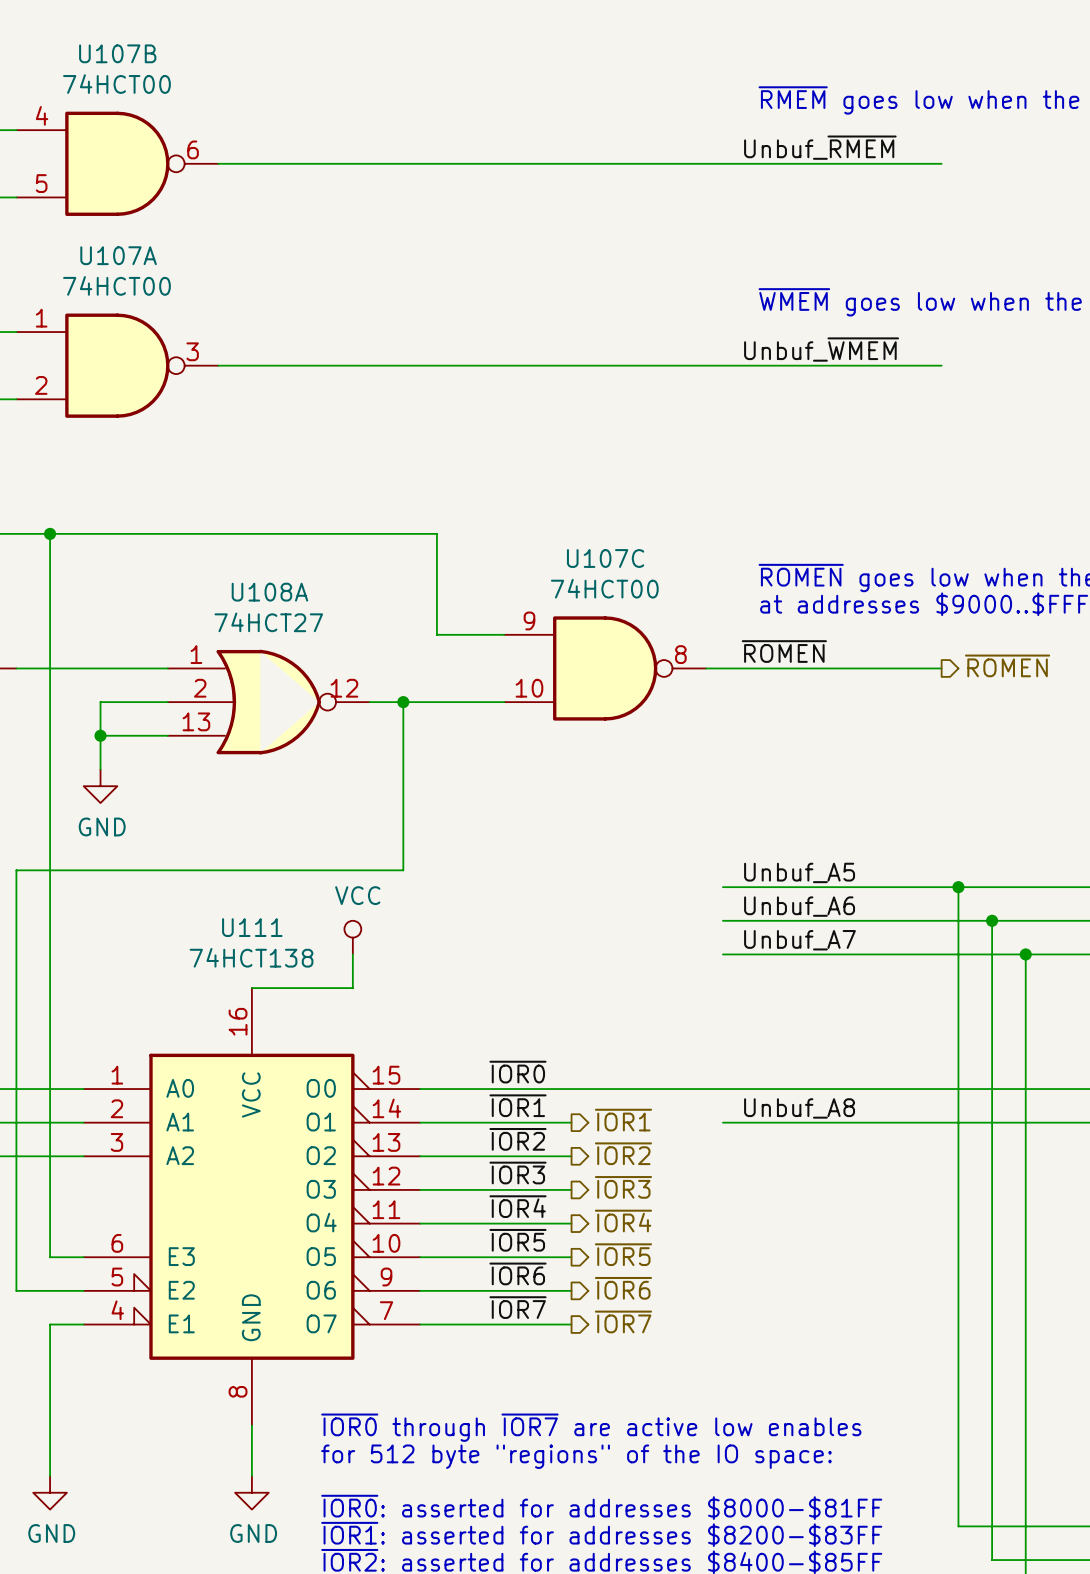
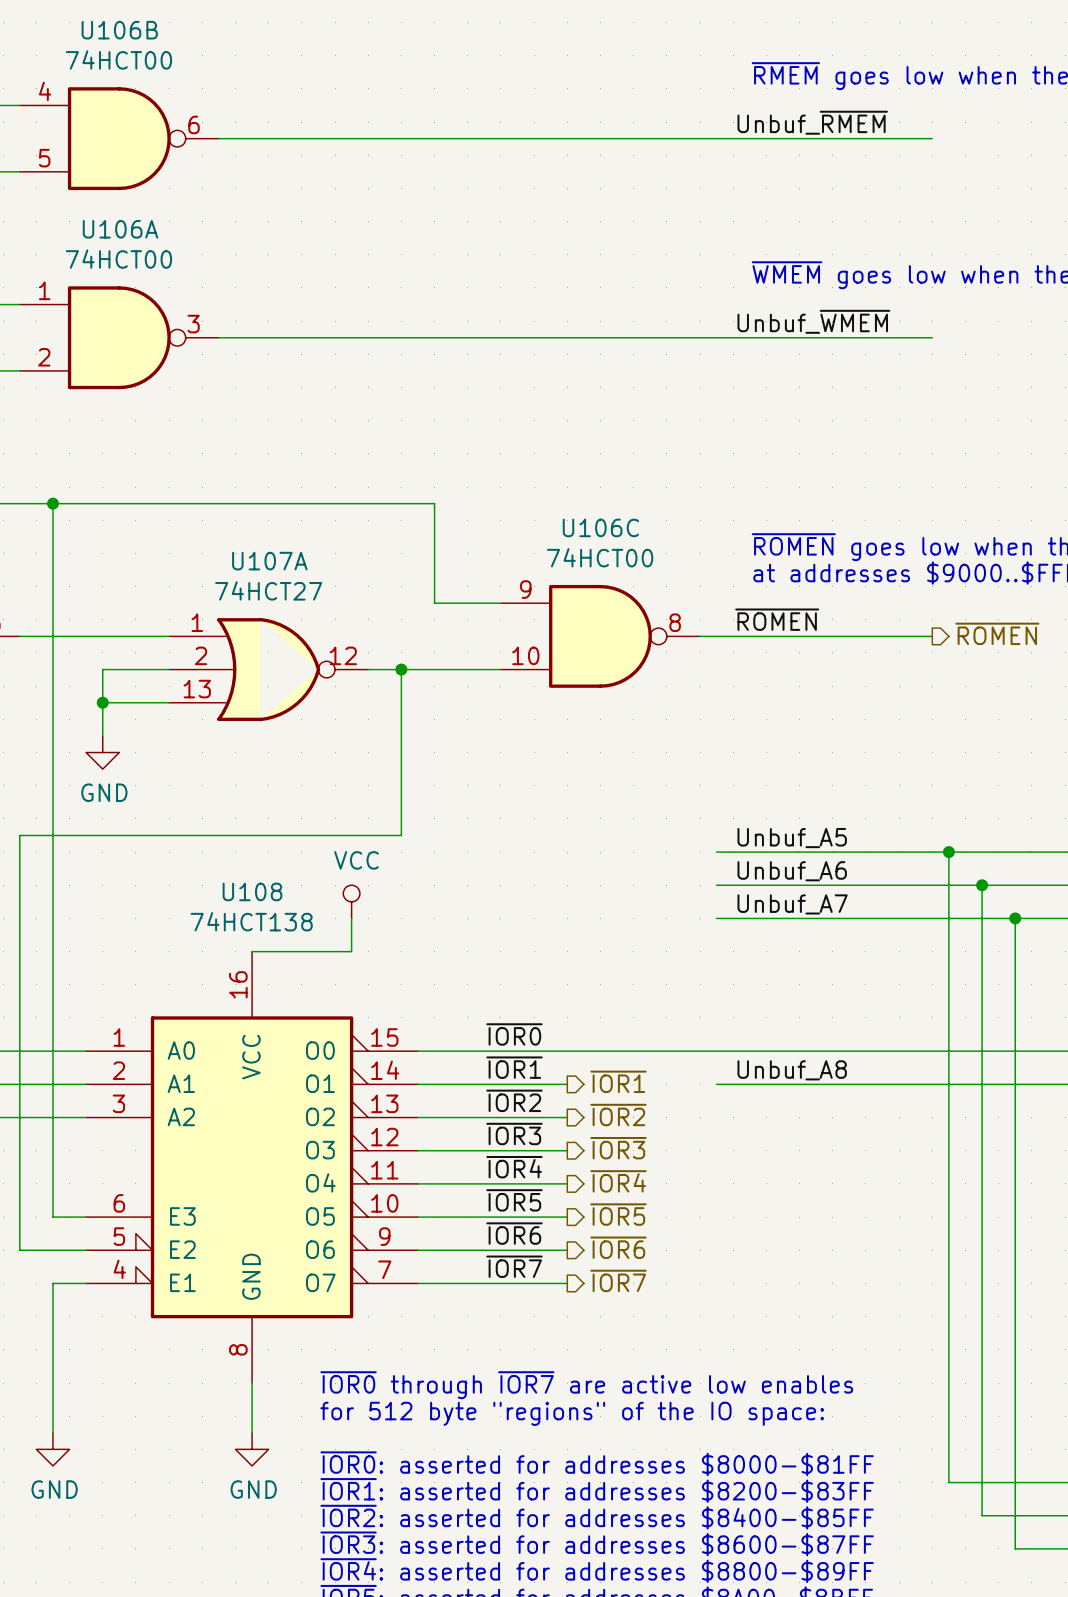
U107B name: U107B (117, 53) -> U106B (119, 30)
U107A name: U107A (118, 255) -> U106A (120, 229)
U107C name: U107C (605, 558) -> U106C (600, 527)
U108A name: U108A (269, 592) -> U107A (269, 561)
U111 name: U111 (252, 927) -> U108 (252, 891)

